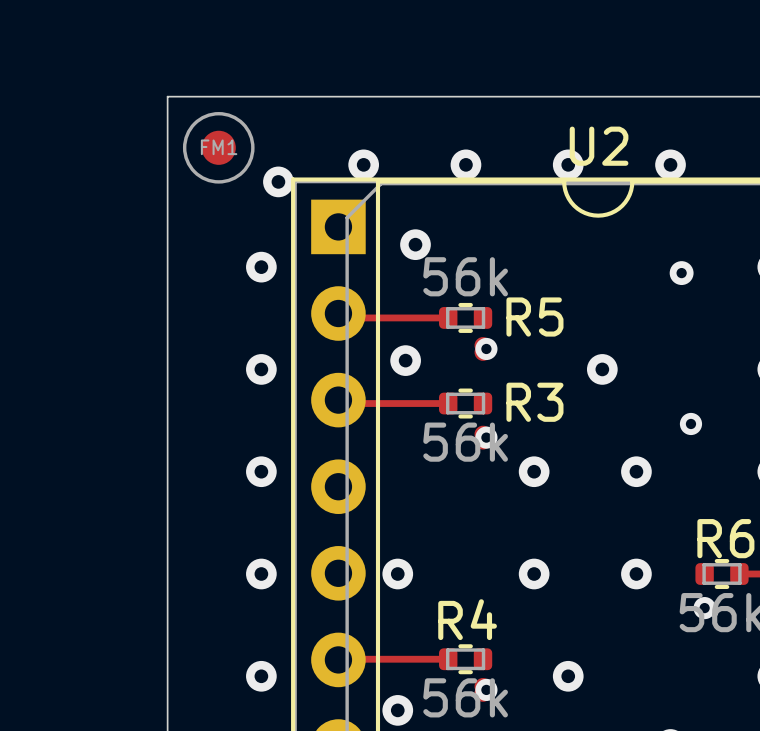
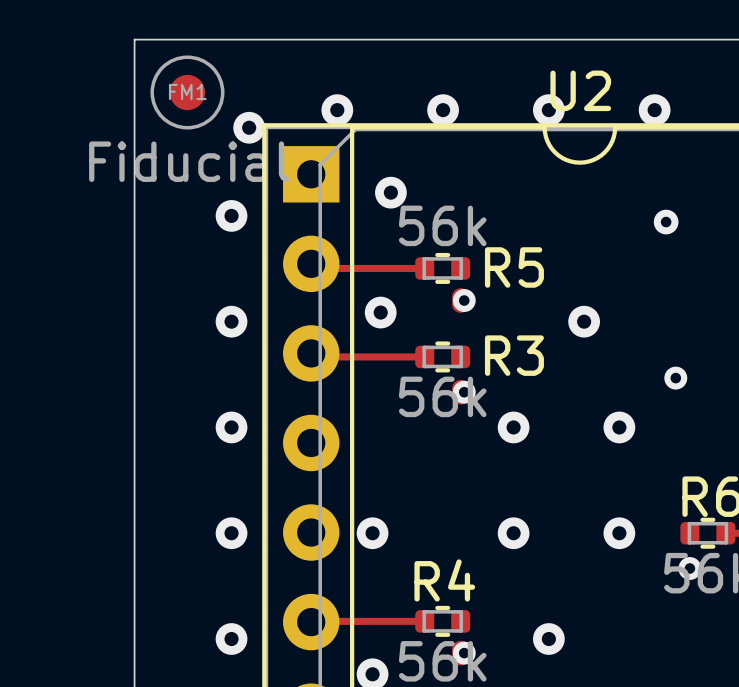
FM1 value: none -> Fiducial (189, 161)

